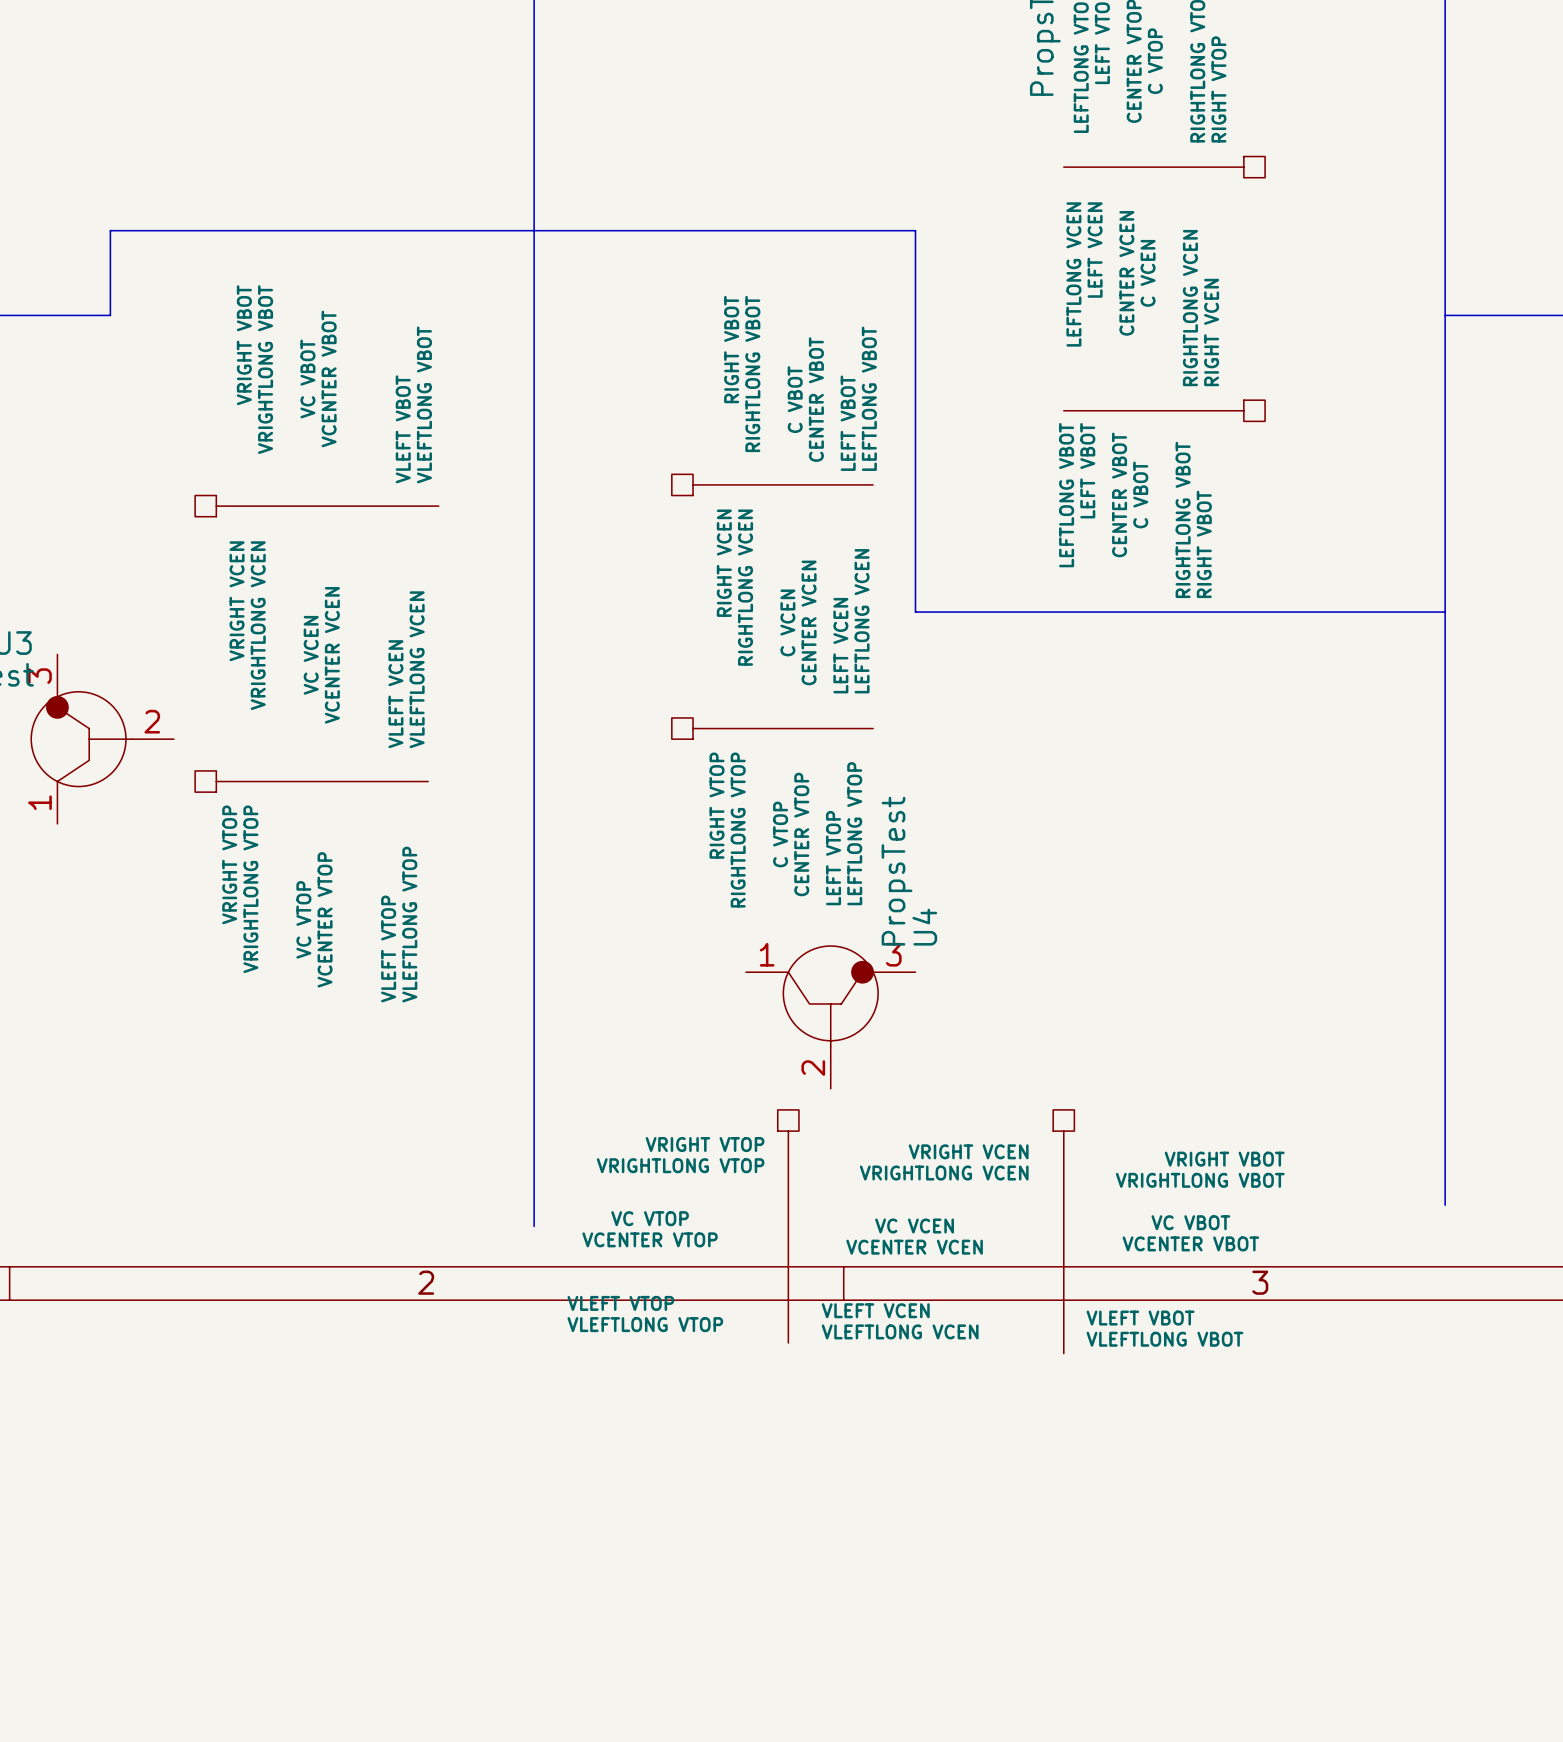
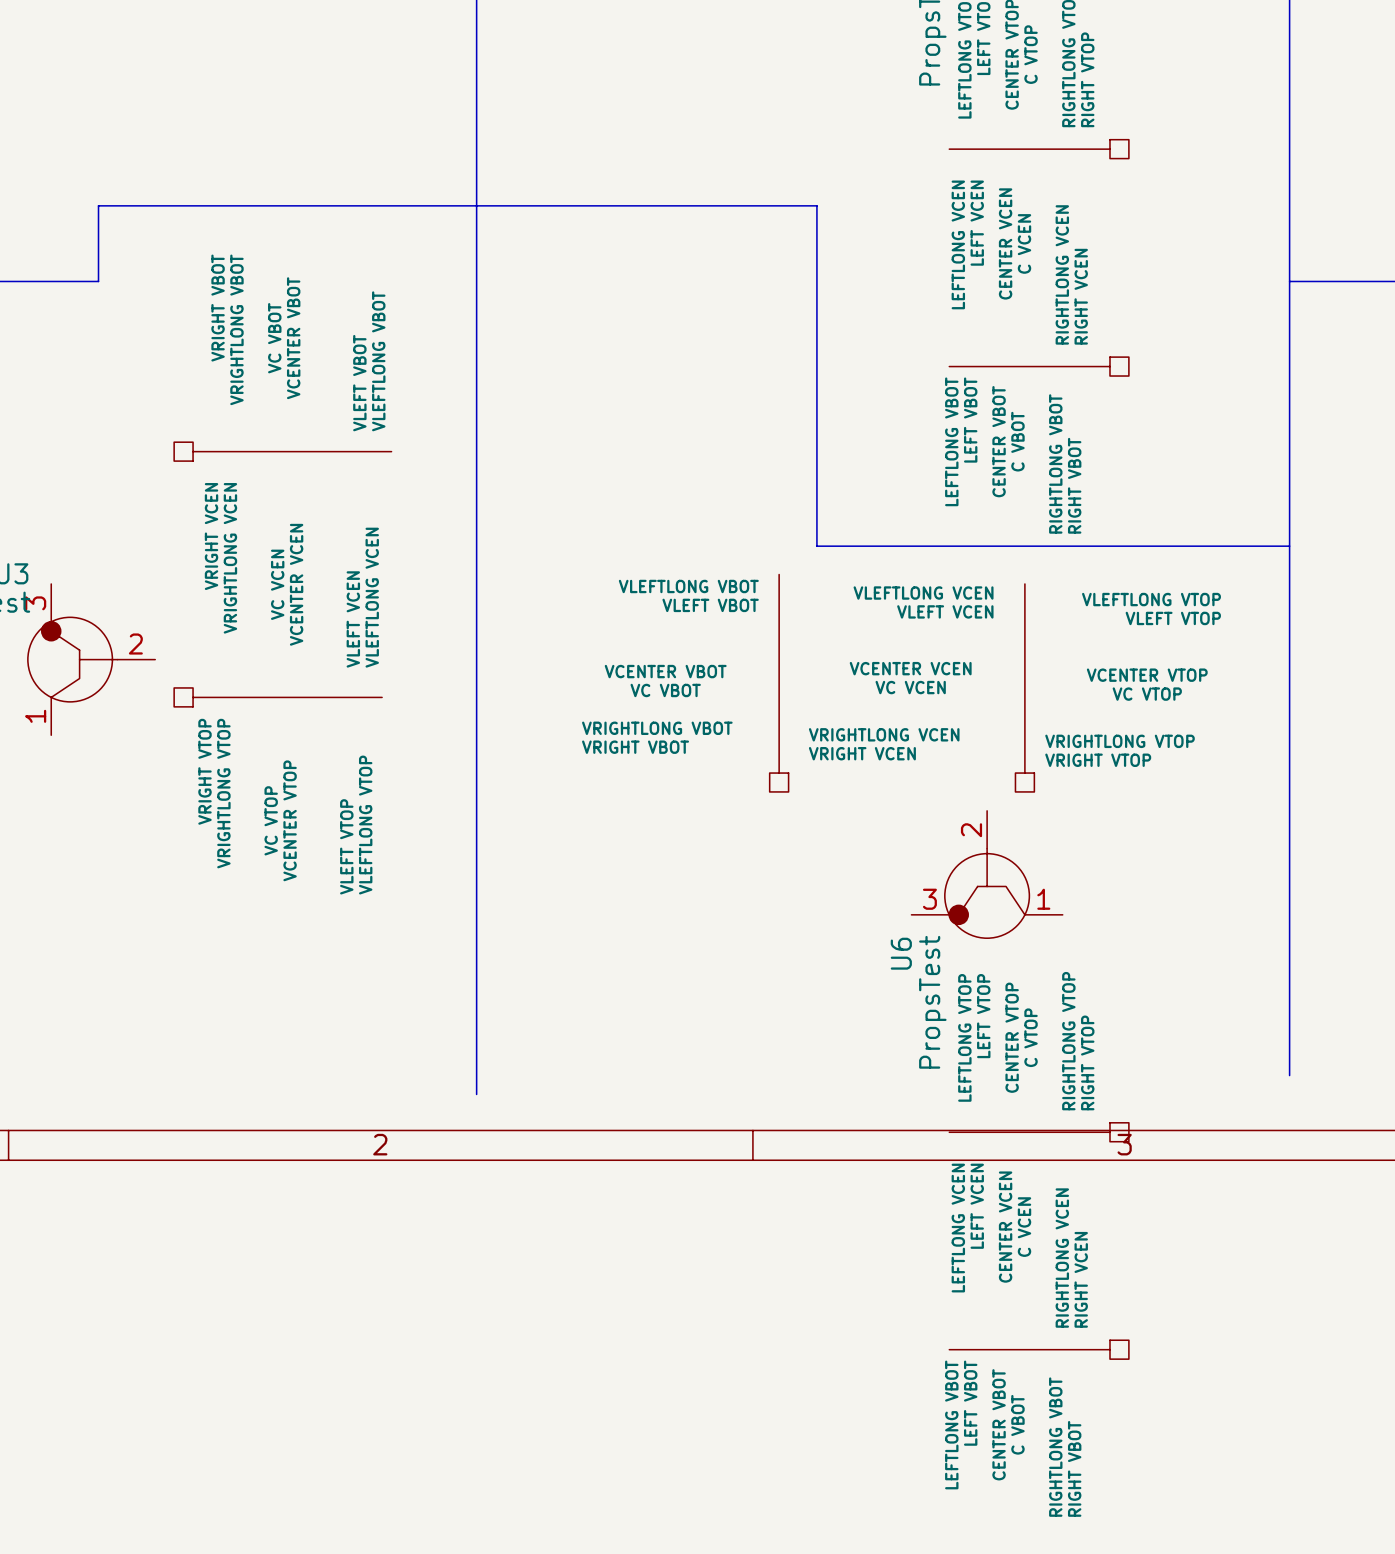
U4: PropsTest (873, 913) -> none
U6: none -> PropsTest (949, 966)

